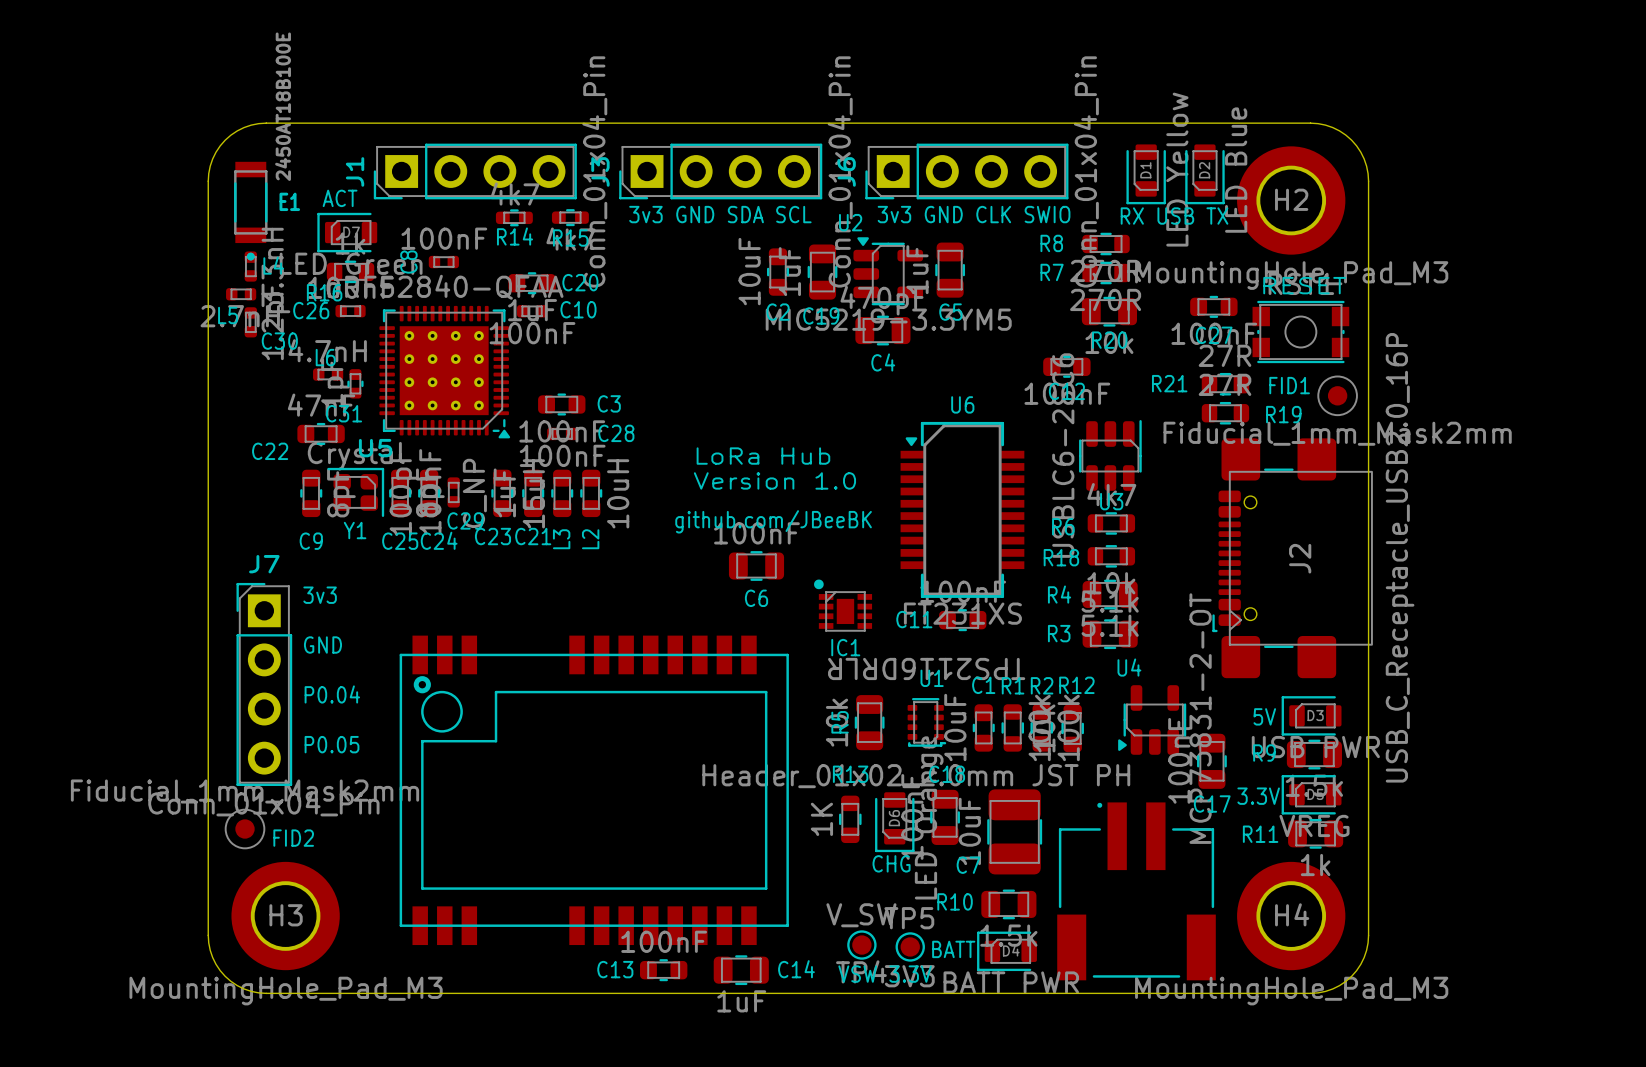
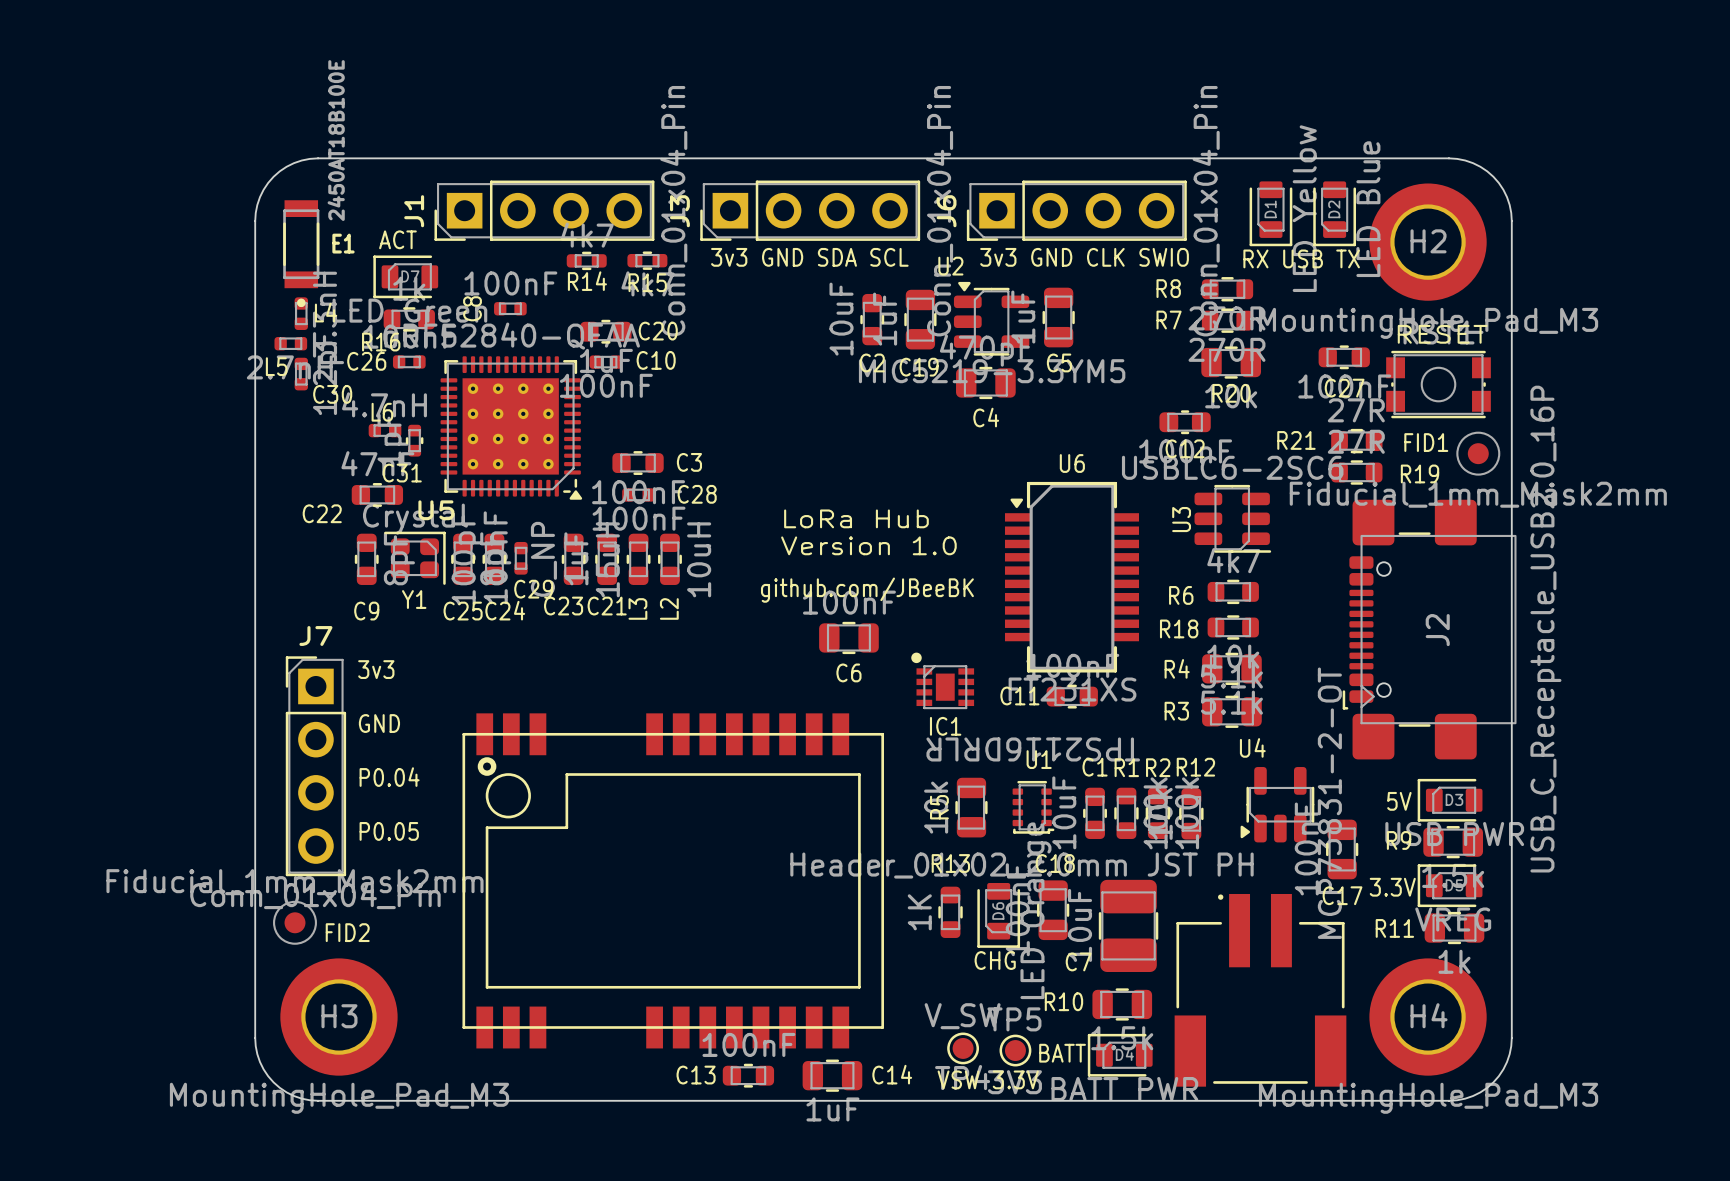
U3 rotation: 0° (1110, 455) -> 90° clockwise (1232, 518)

